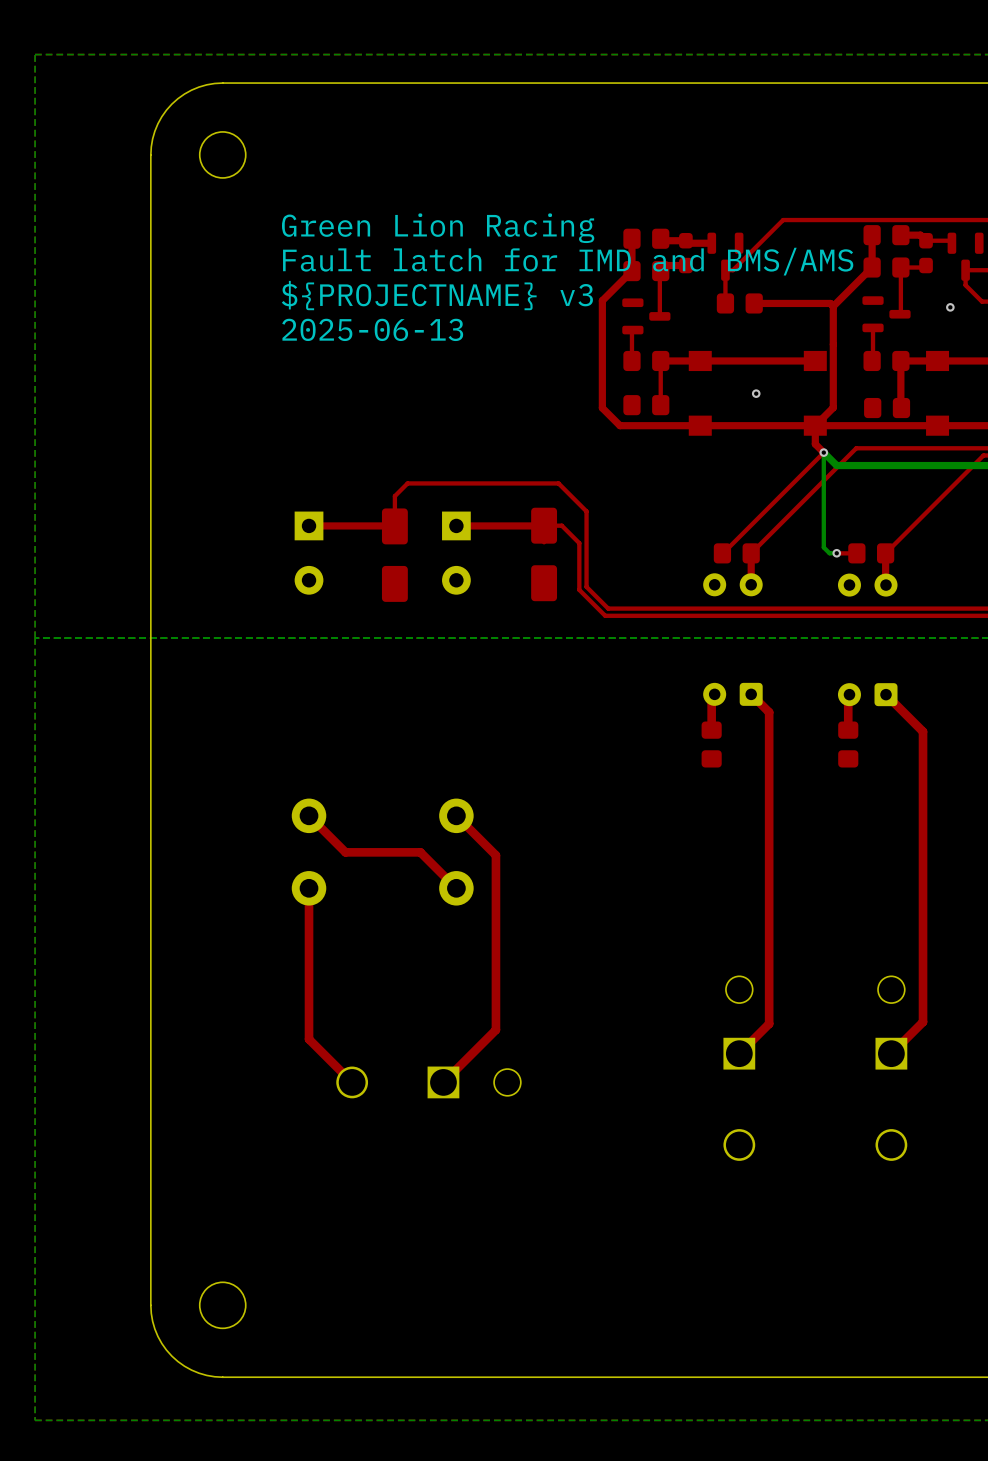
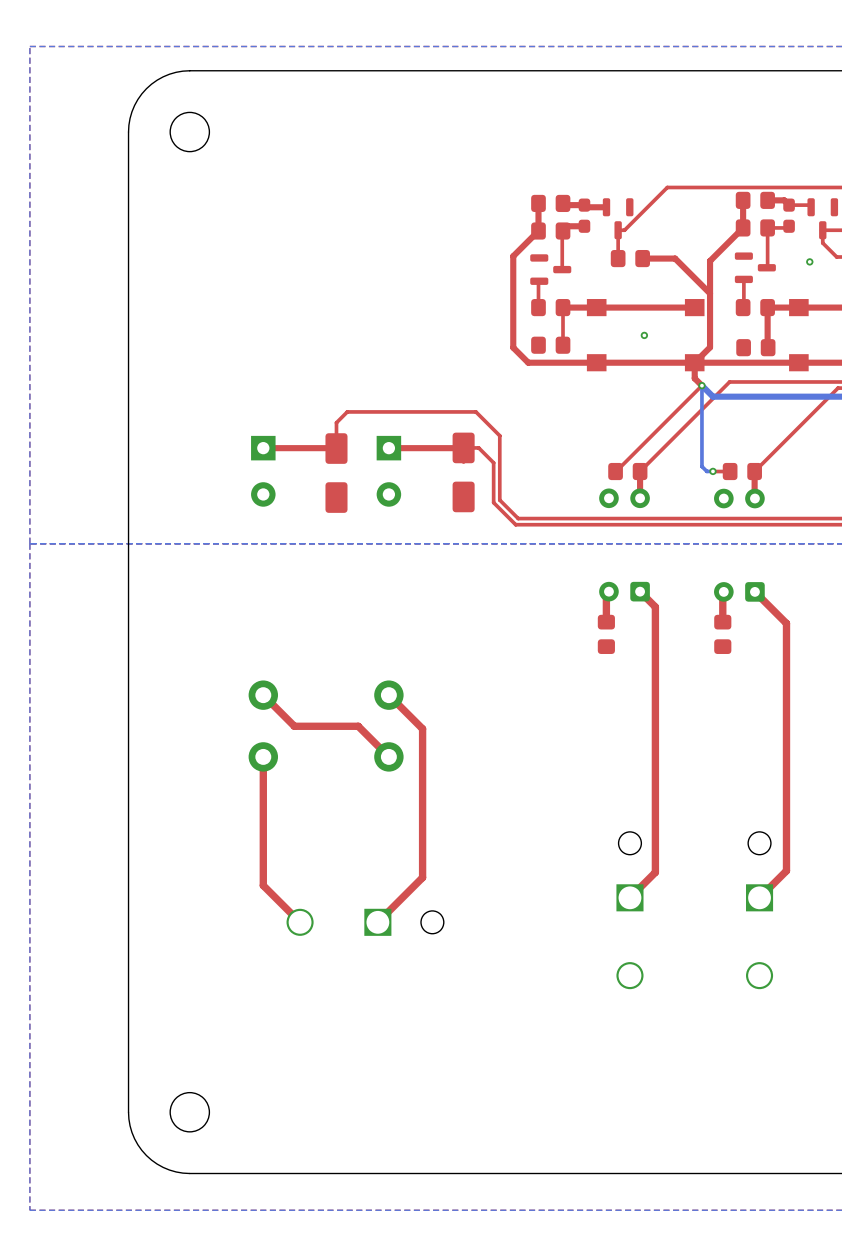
text: Green Lion Racing (438, 228) -> none
text: Fault latch for IMD and BMS/AMS (568, 261) -> none
text: ${PROJECTNAME} v3 (437, 295) -> none
top track: (792, 303) (830, 303) (833, 306) -> (675, 258) (710, 293)
text: 2025-06-13 (372, 329) -> none

